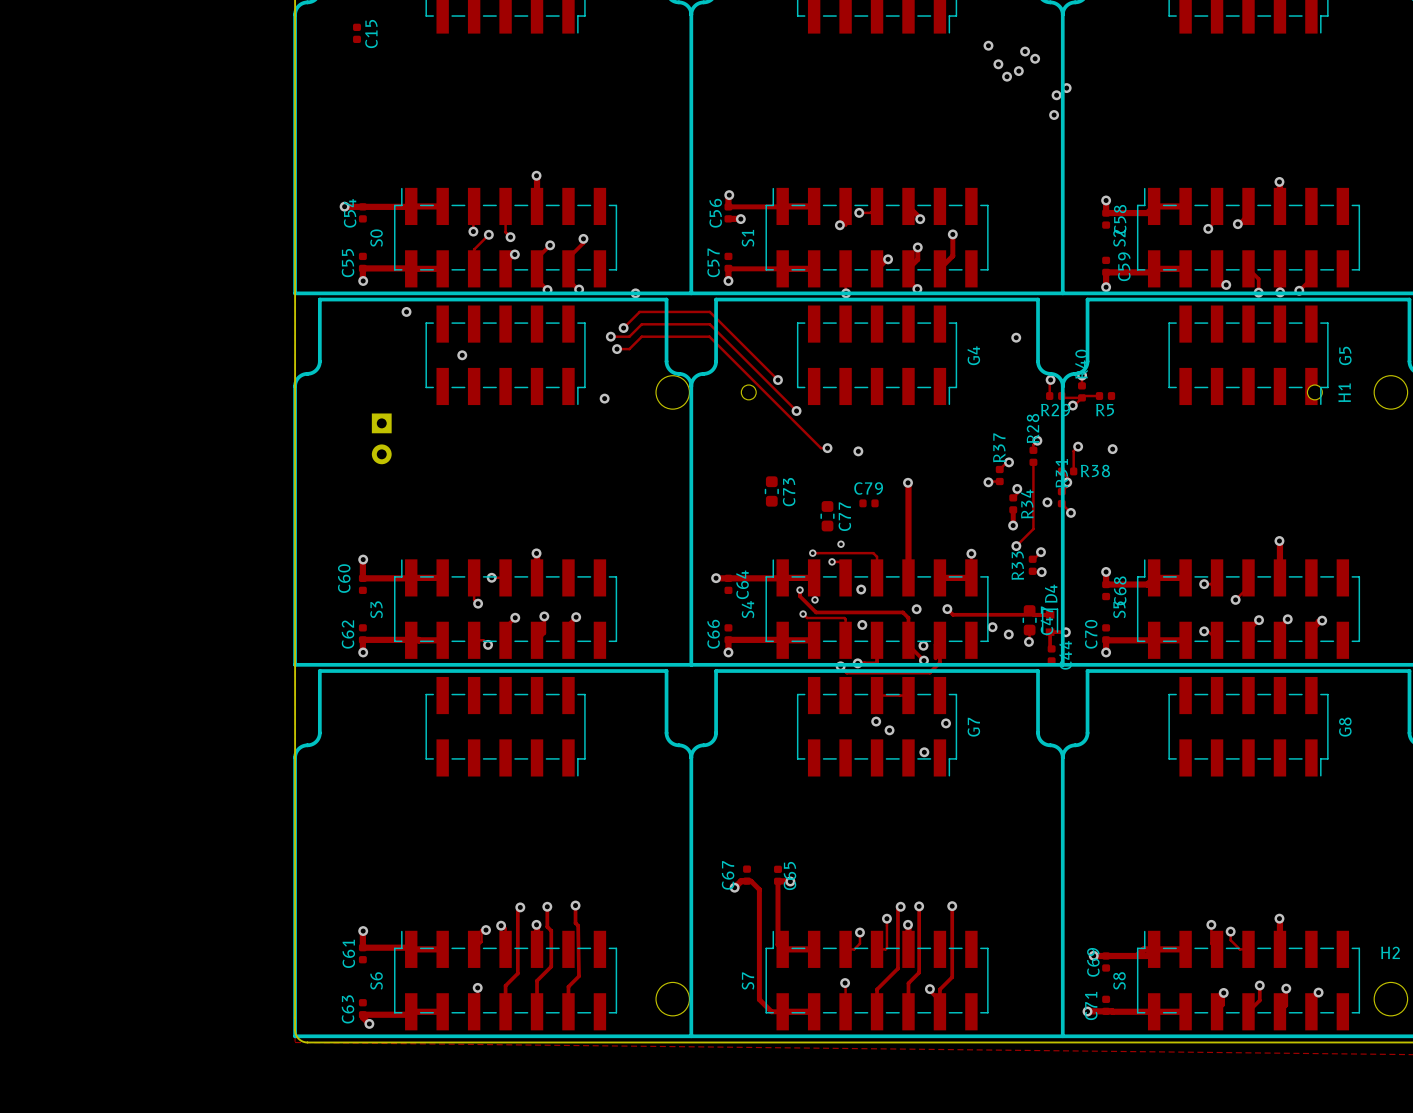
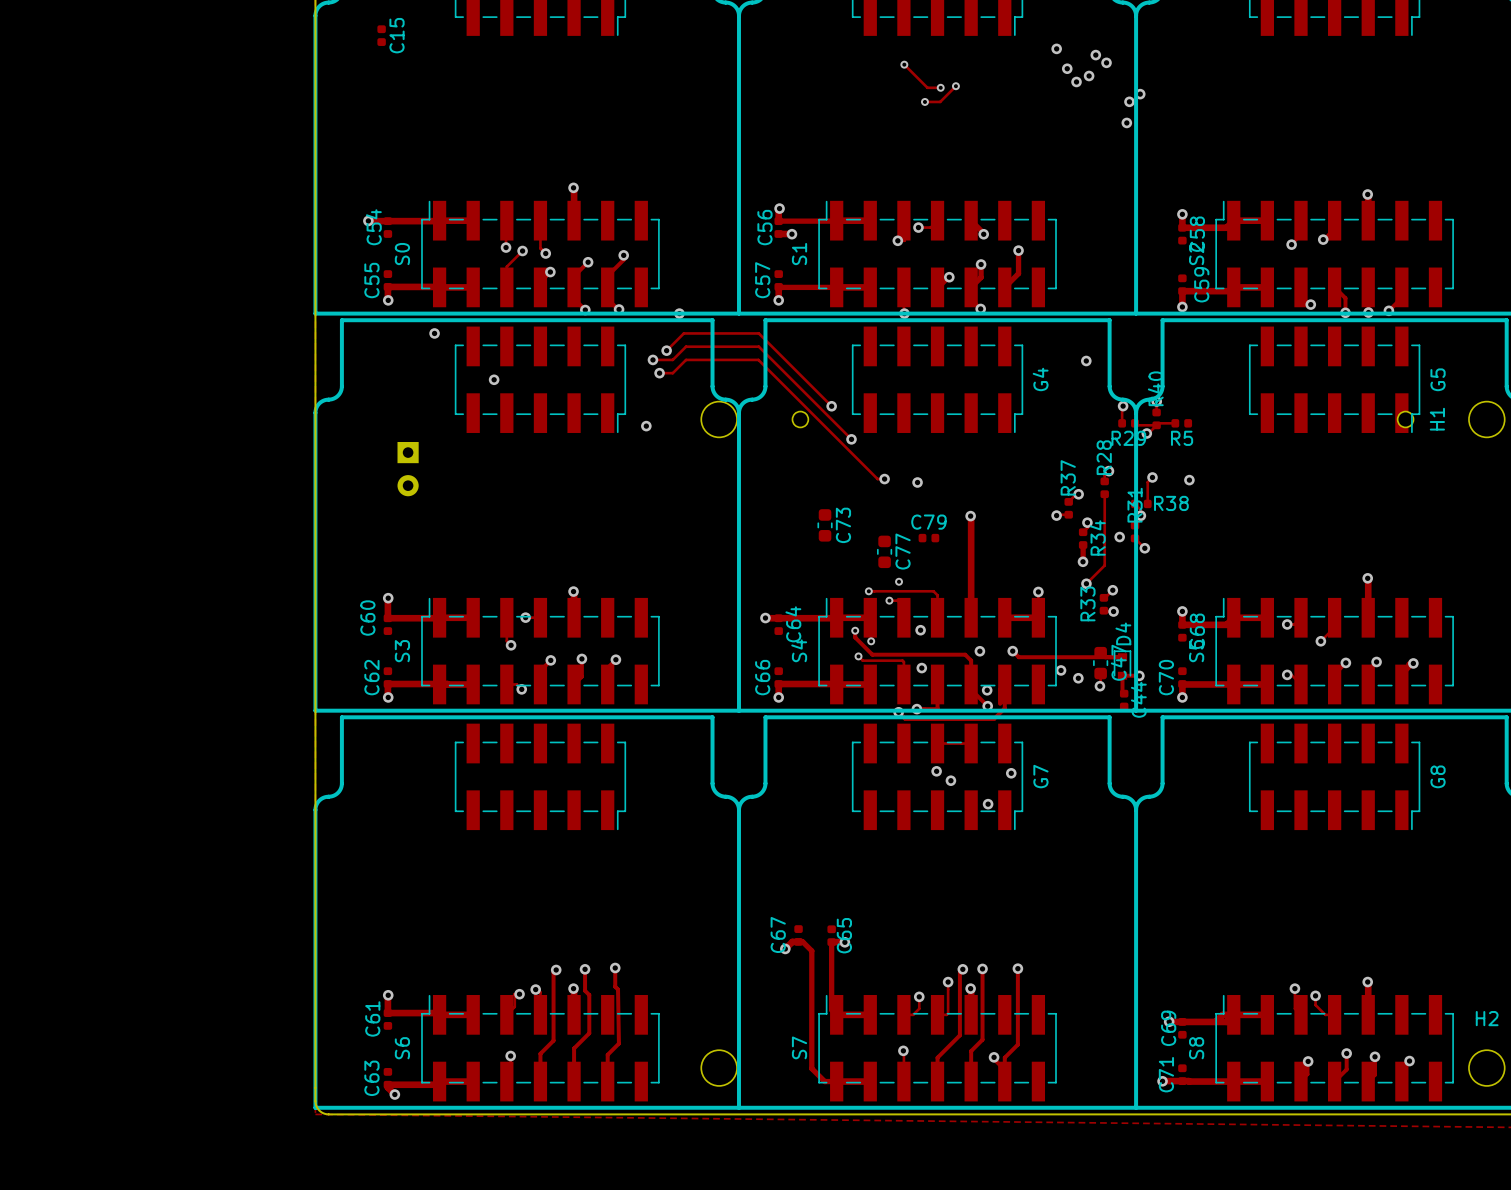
track: none -> (904, 64) (927, 87) (940, 87)
via: none -> (904, 64)
track: none -> (955, 86) (940, 101) (924, 101)
via: none -> (955, 86)
via: none -> (940, 87)
via: none -> (924, 101)

